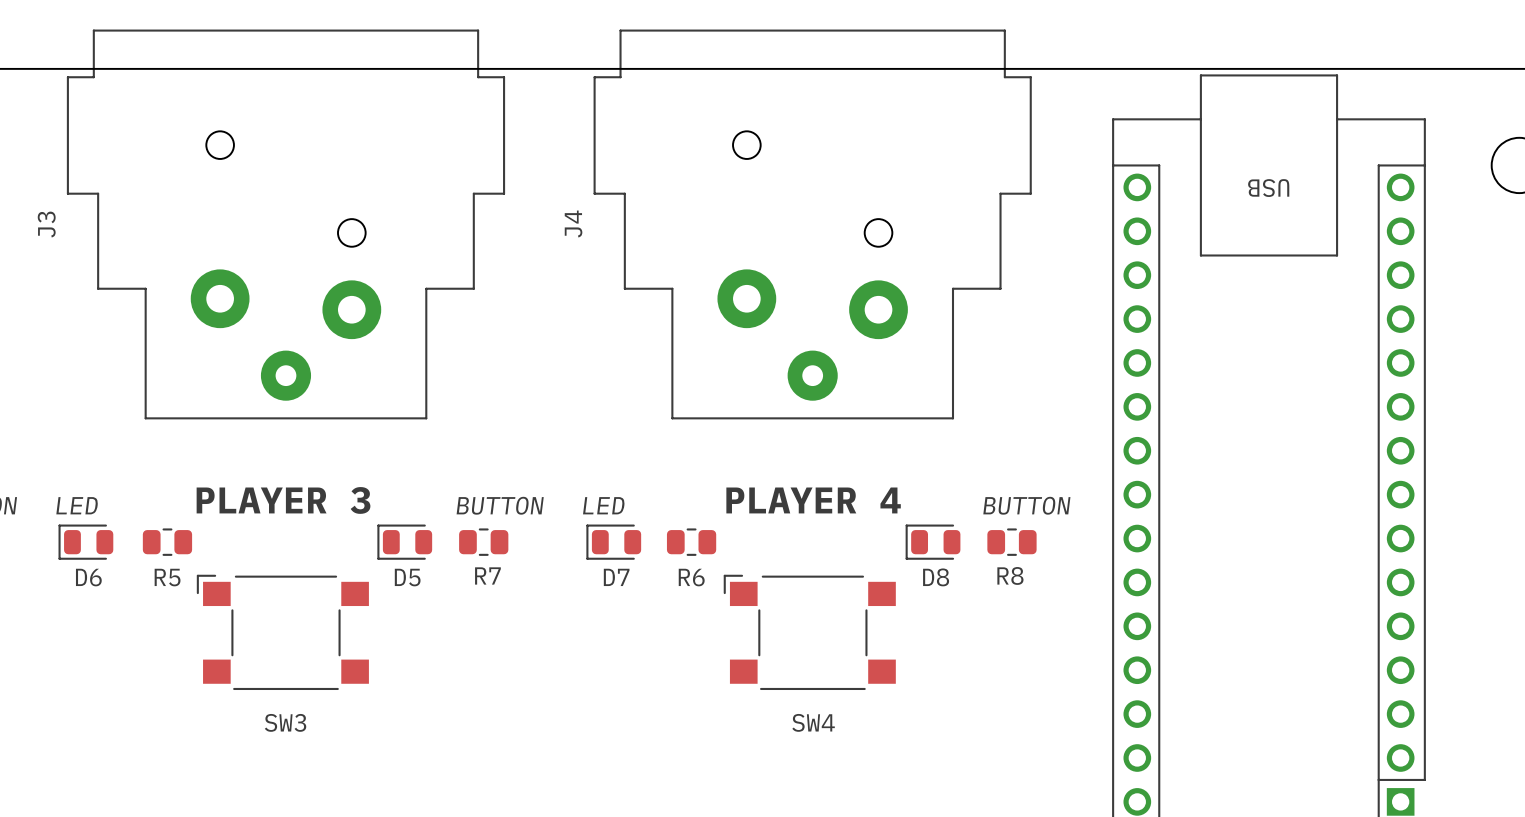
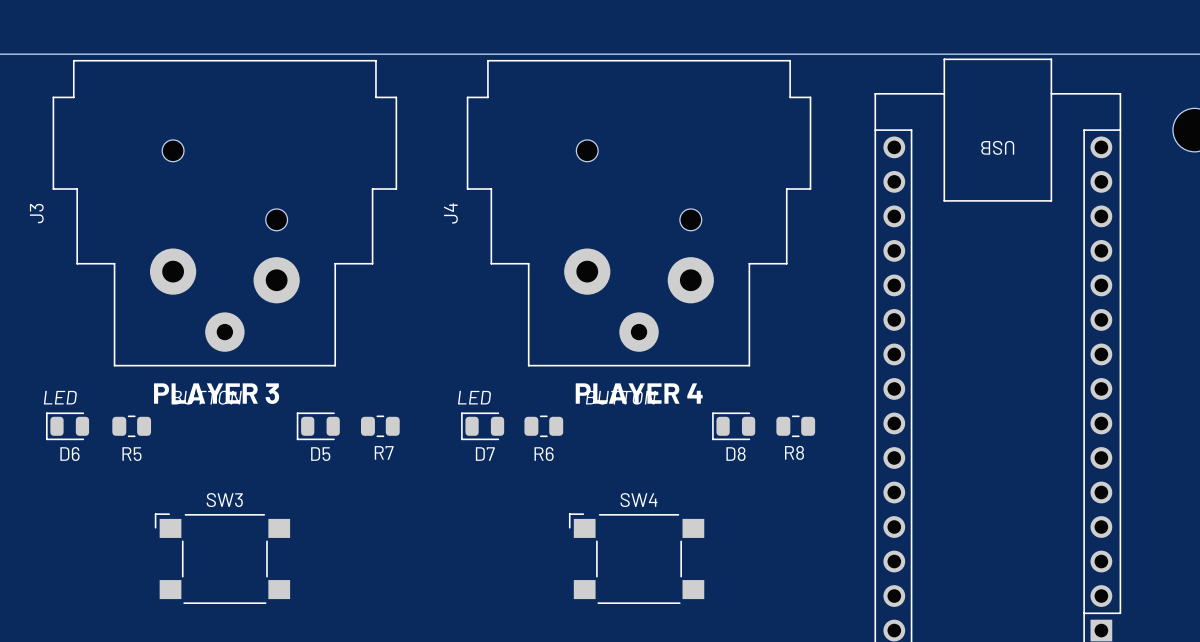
J3 position: (285, 224) -> (224, 213)
J4 position: (812, 224) -> (639, 213)
SW3 position: (282, 632) -> (222, 558)
SW4 position: (809, 632) -> (636, 558)
SW3 name position: SW3 (285, 722) -> SW3 (224, 500)
SW4 name position: SW4 (813, 722) -> SW4 (638, 500)

